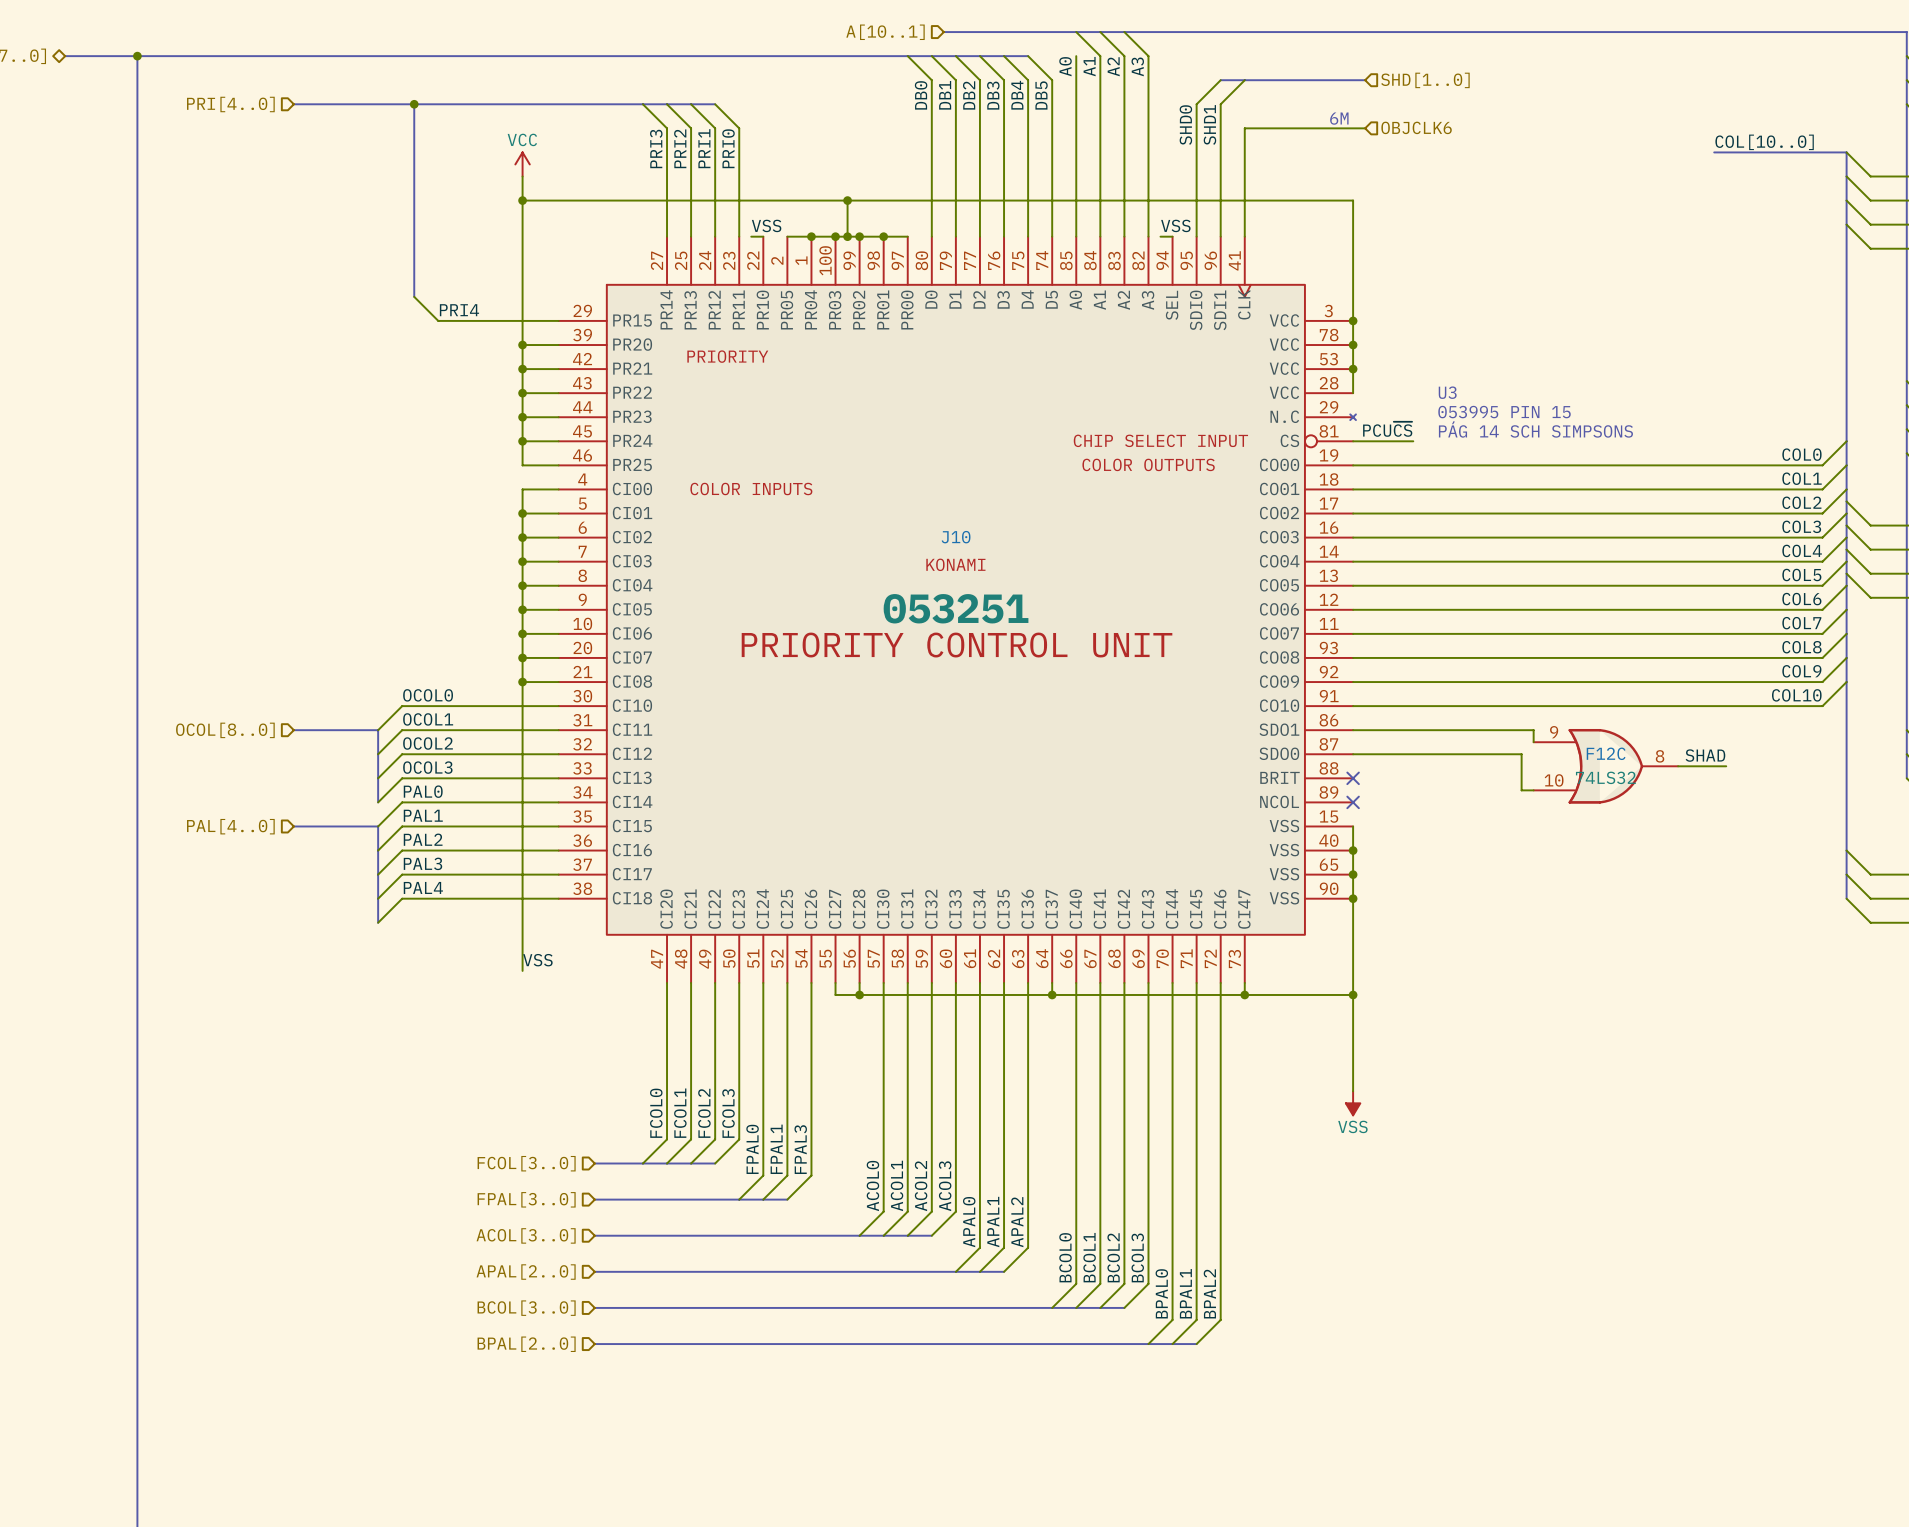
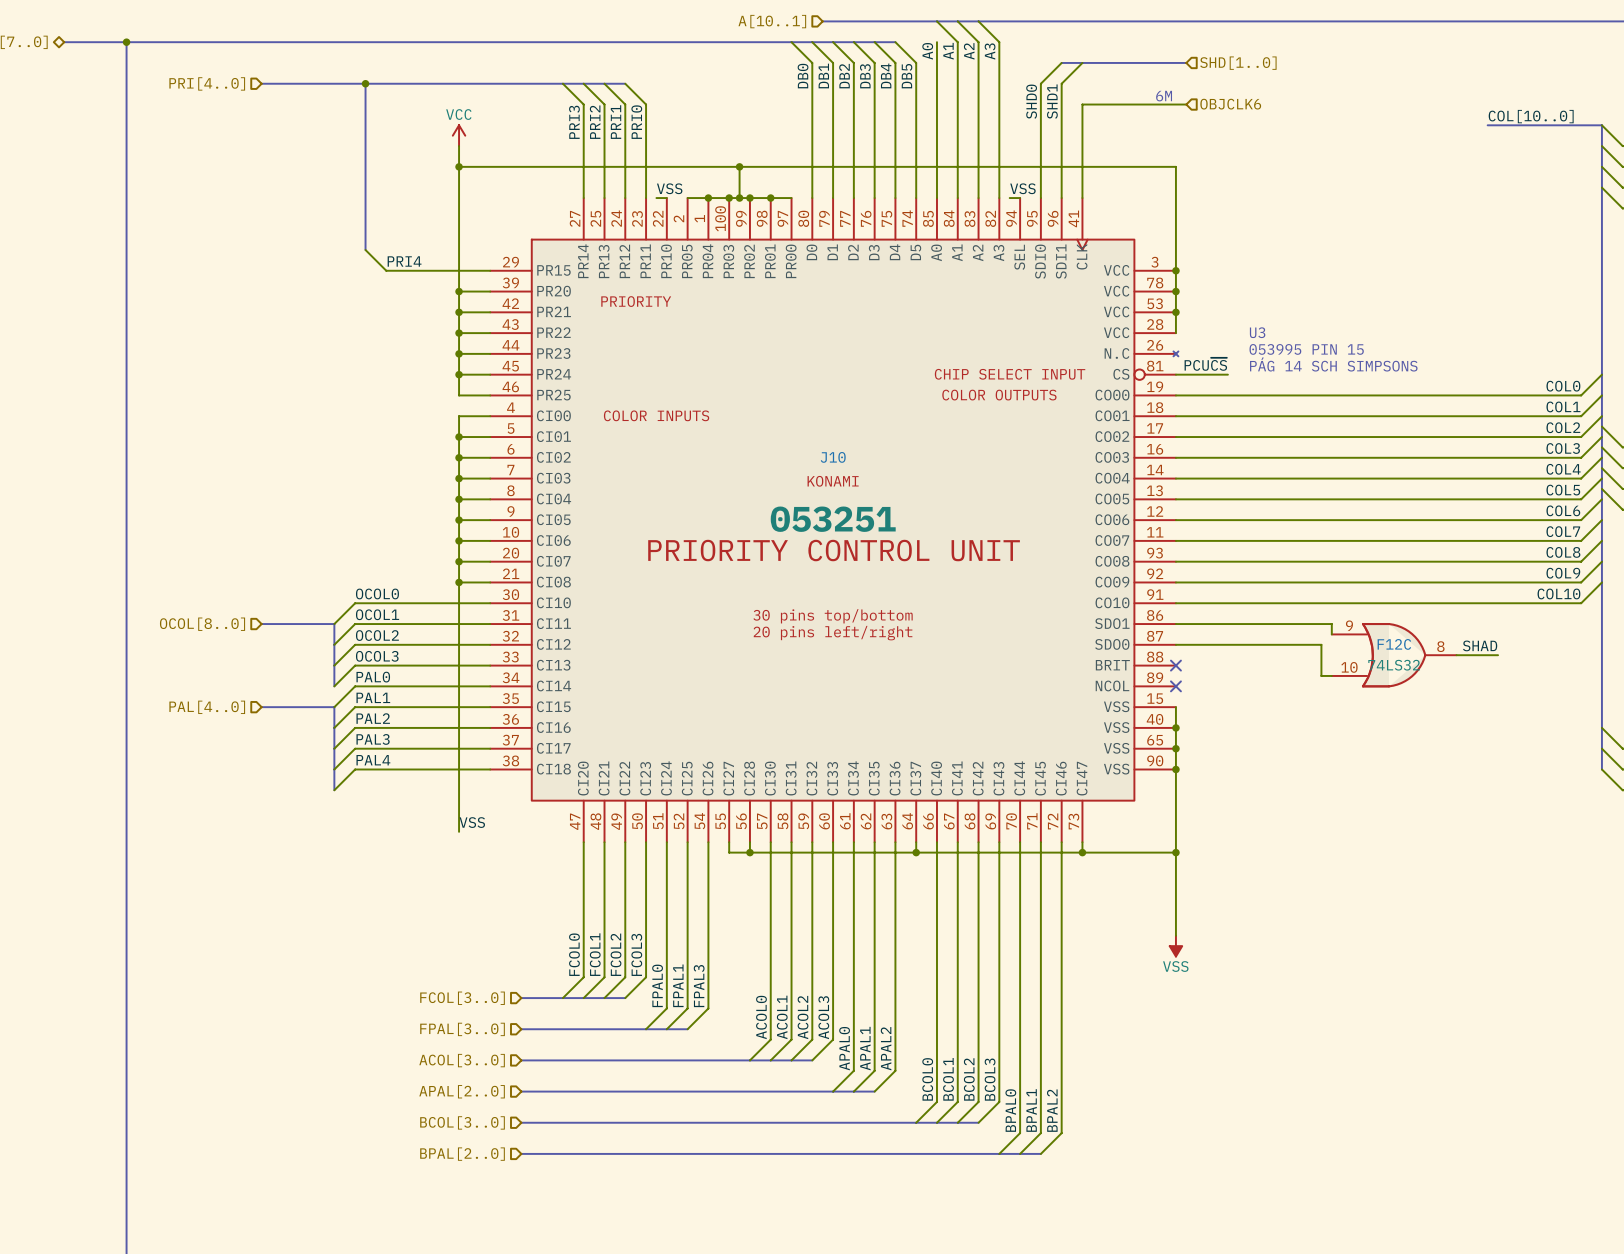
J10 pin number: 29 (1329, 407) -> 26 (1155, 345)
J10 text: none -> 30 pins top/bottom (833, 616)
J10 text: none -> 20 pins left/right (833, 633)

